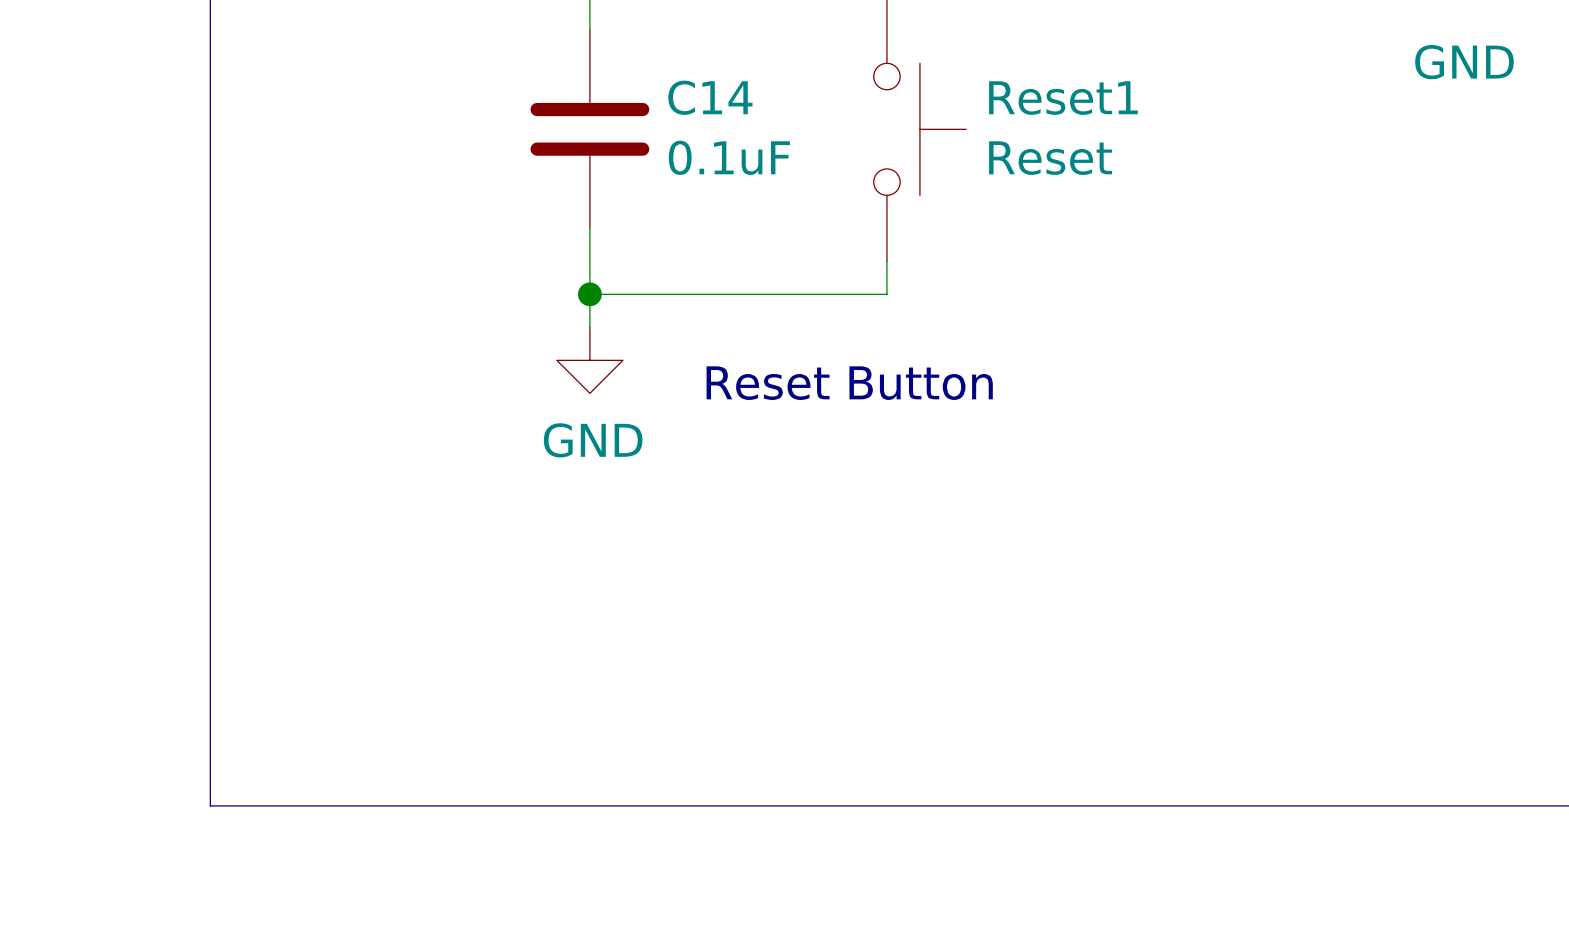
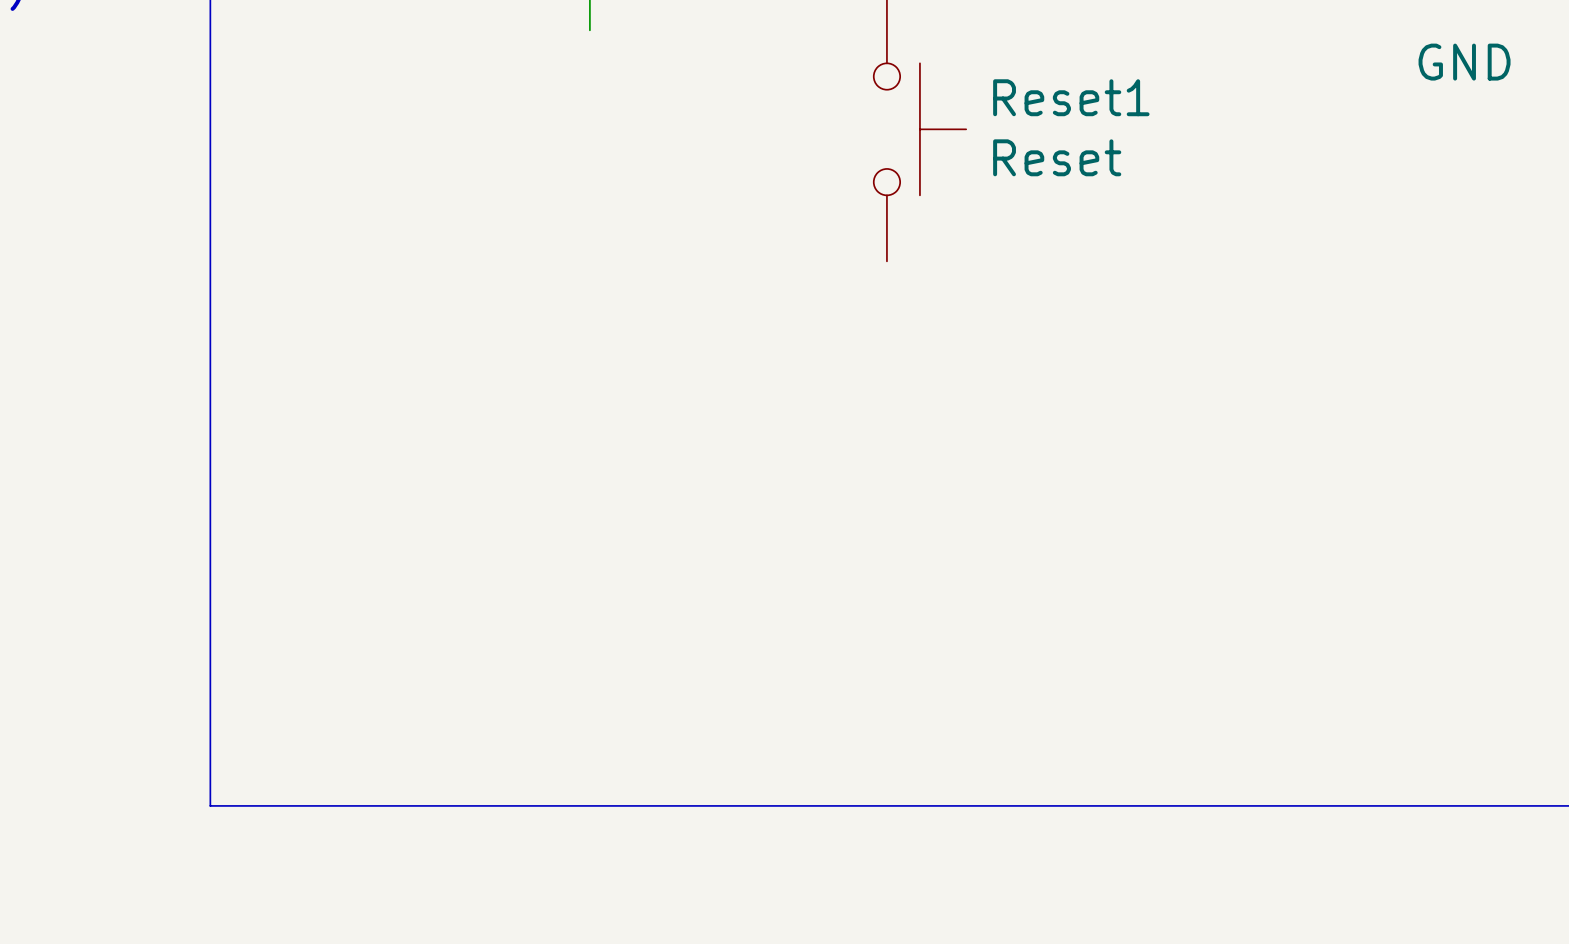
C14: 0.1uF (589, 129) -> none
wire: (589, 228) (589, 327) -> none
wire: (886, 261) (886, 294) (589, 294) -> none
junction: (589, 294) -> none
power symbol: GND (589, 360) -> none
text: Reset Button (849, 383) -> none

